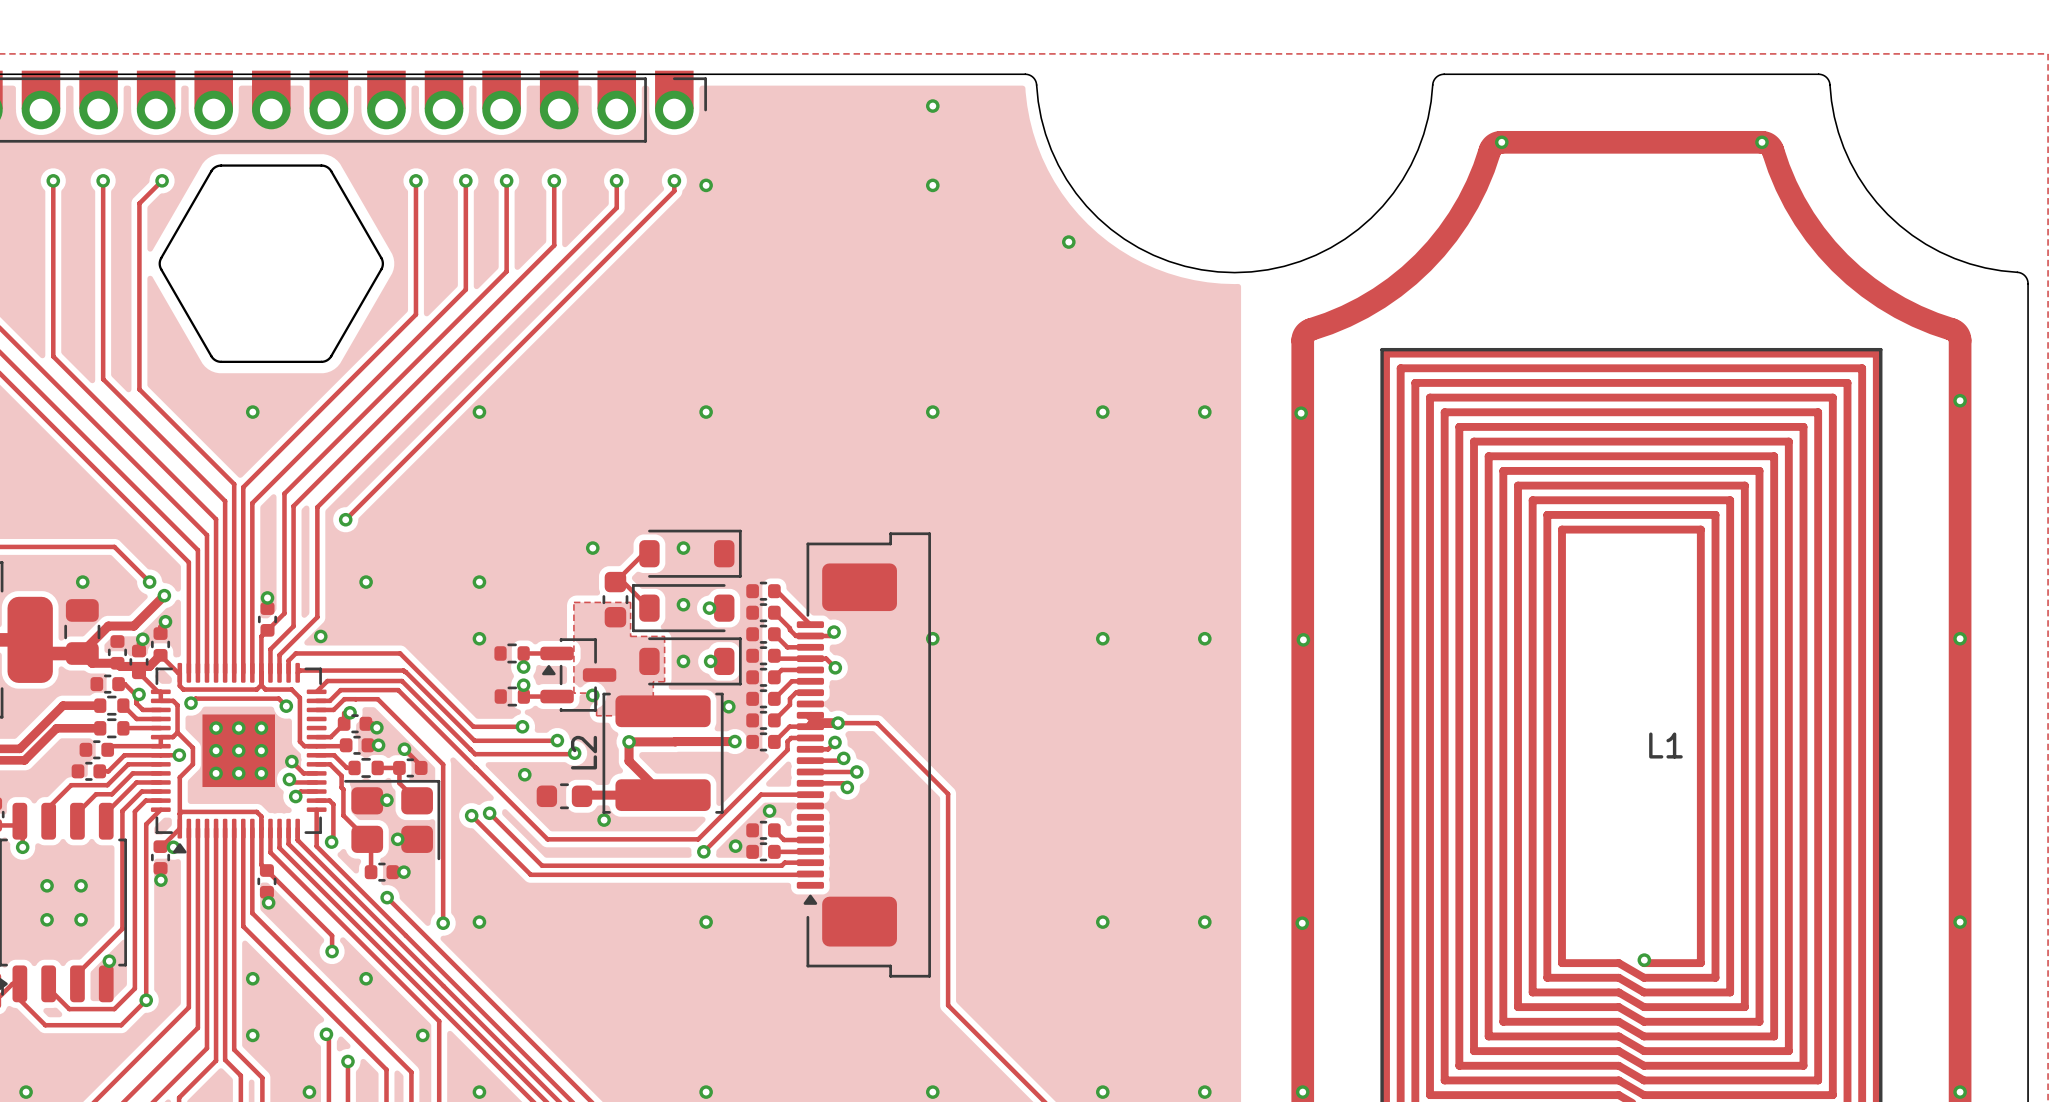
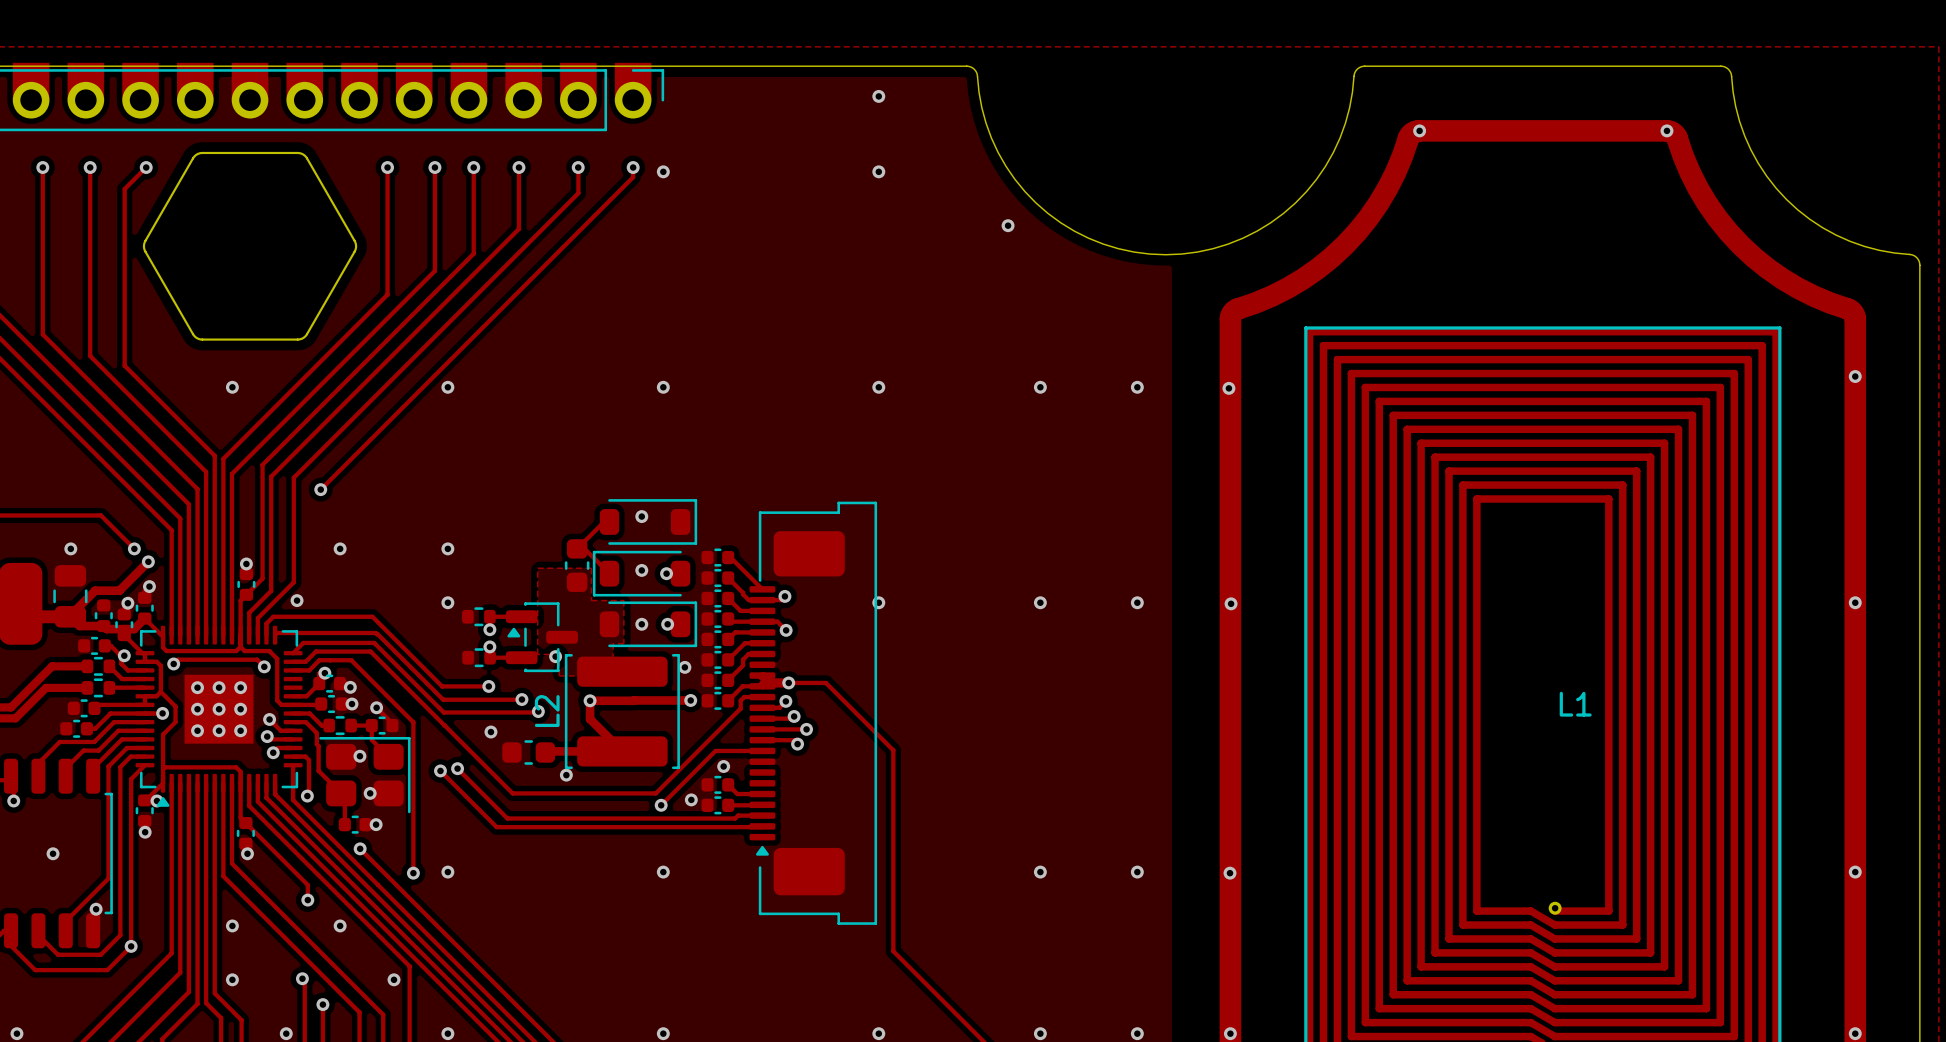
via: (592, 548) -> none
via: (47, 885) -> none
via: (81, 885) -> none
via: none -> (53, 853)
via: (47, 919) -> none
via: (81, 919) -> none

